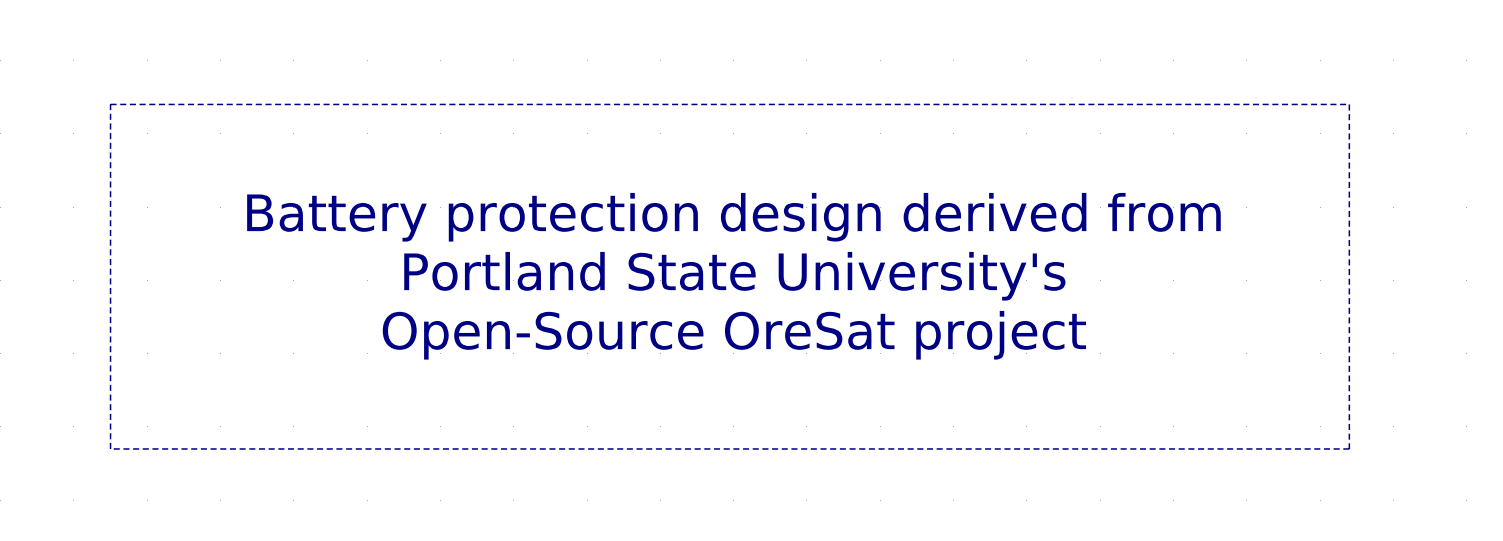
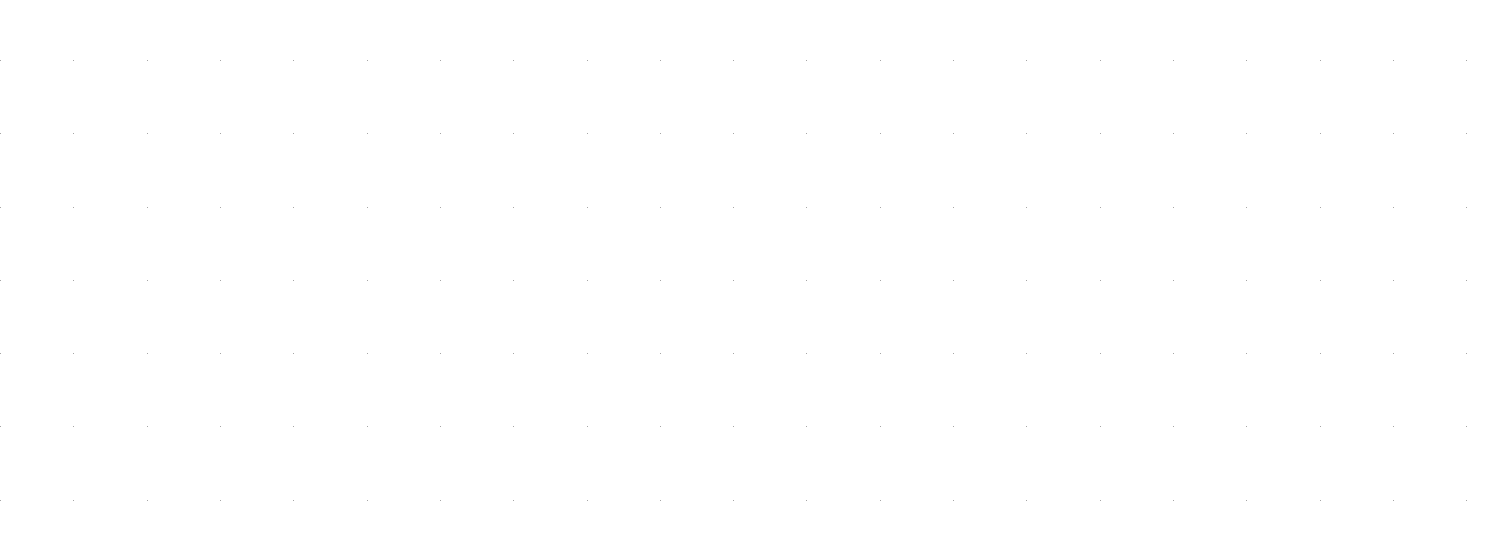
line: (110, 104) (1349, 104) (1349, 448) (110, 448) (110, 104) -> none
text: Battery protection design derived from (733, 217) -> none
text: Portland State University's (734, 276) -> none
text: Open-Source OreSat project (734, 335) -> none

